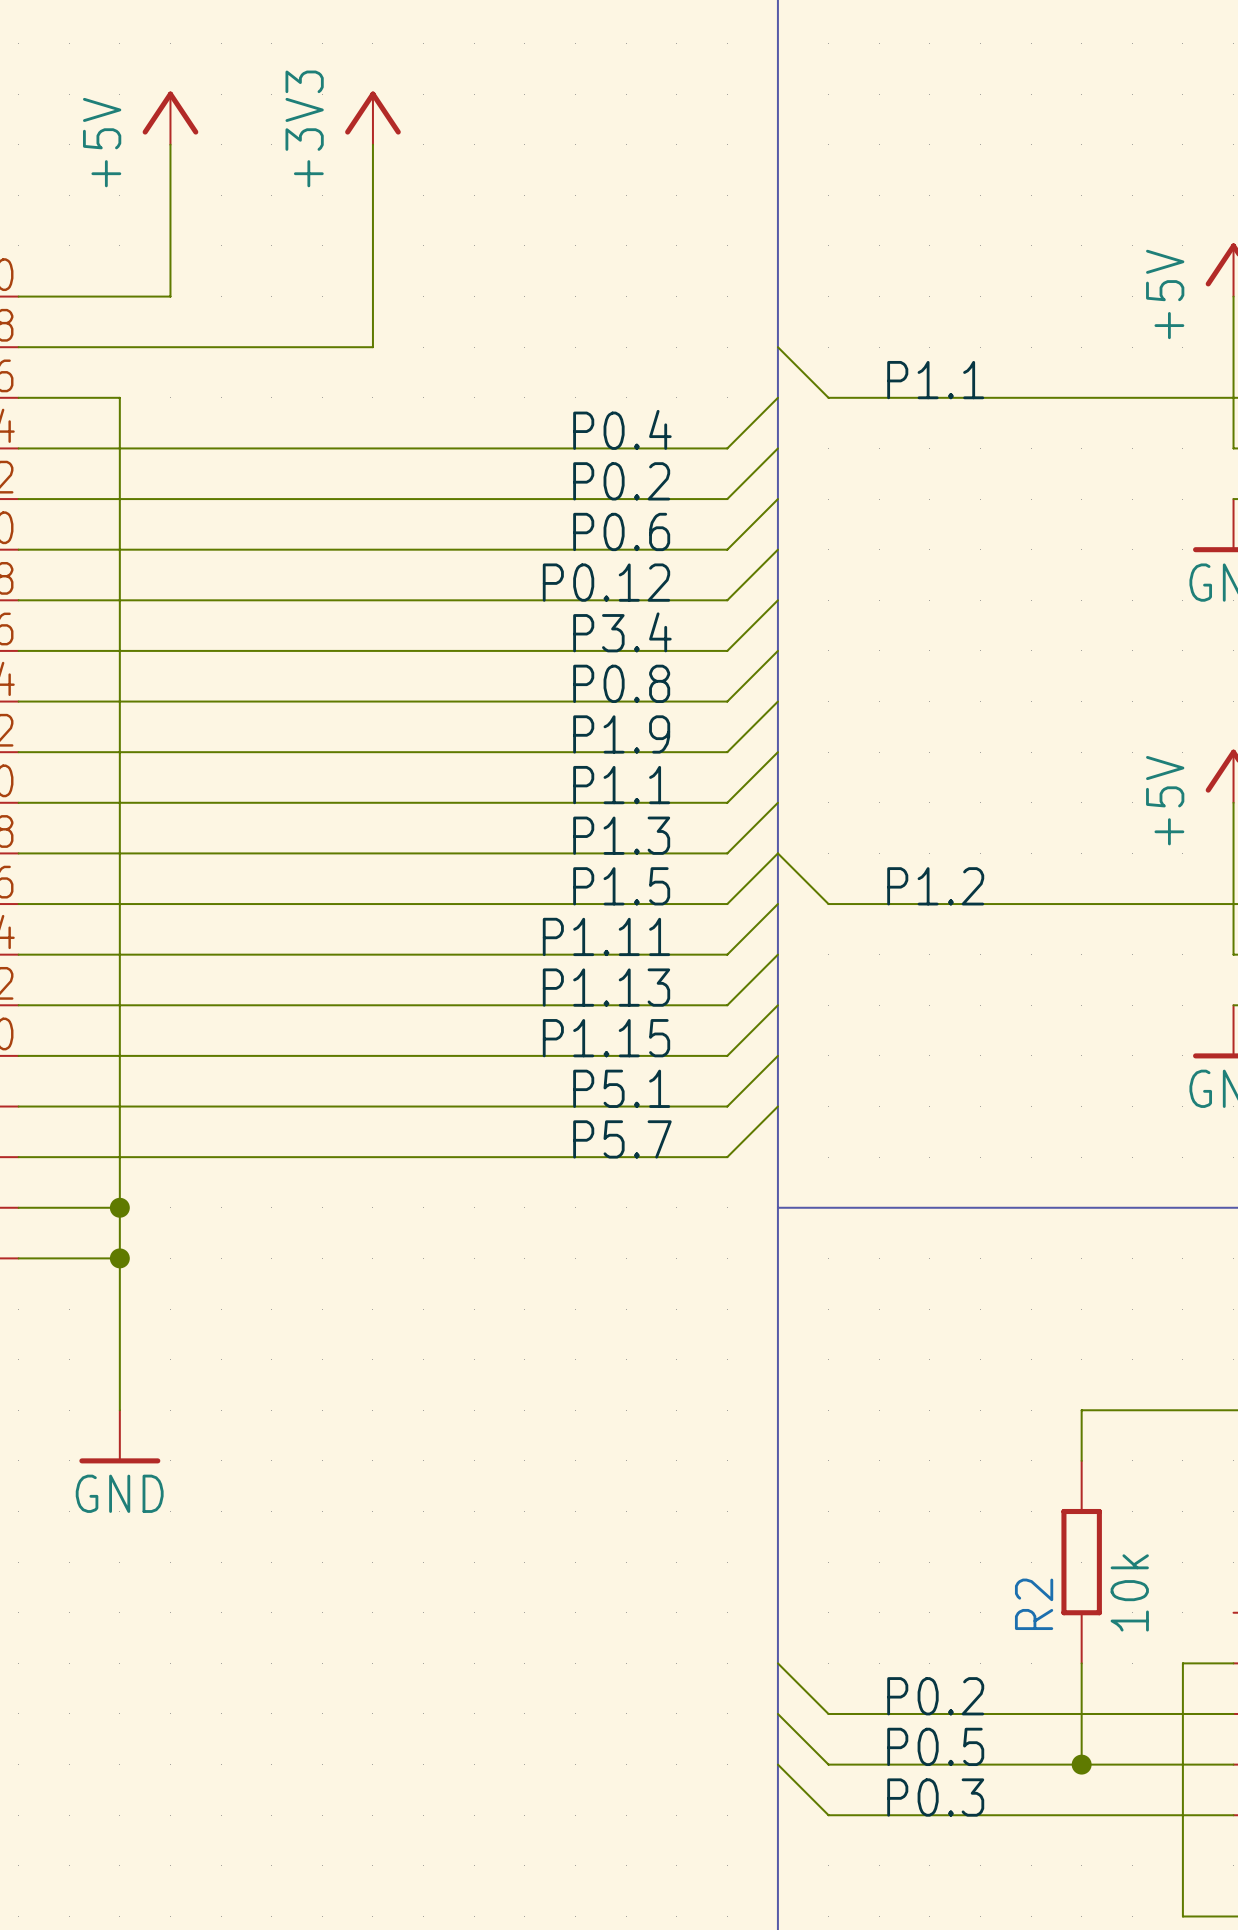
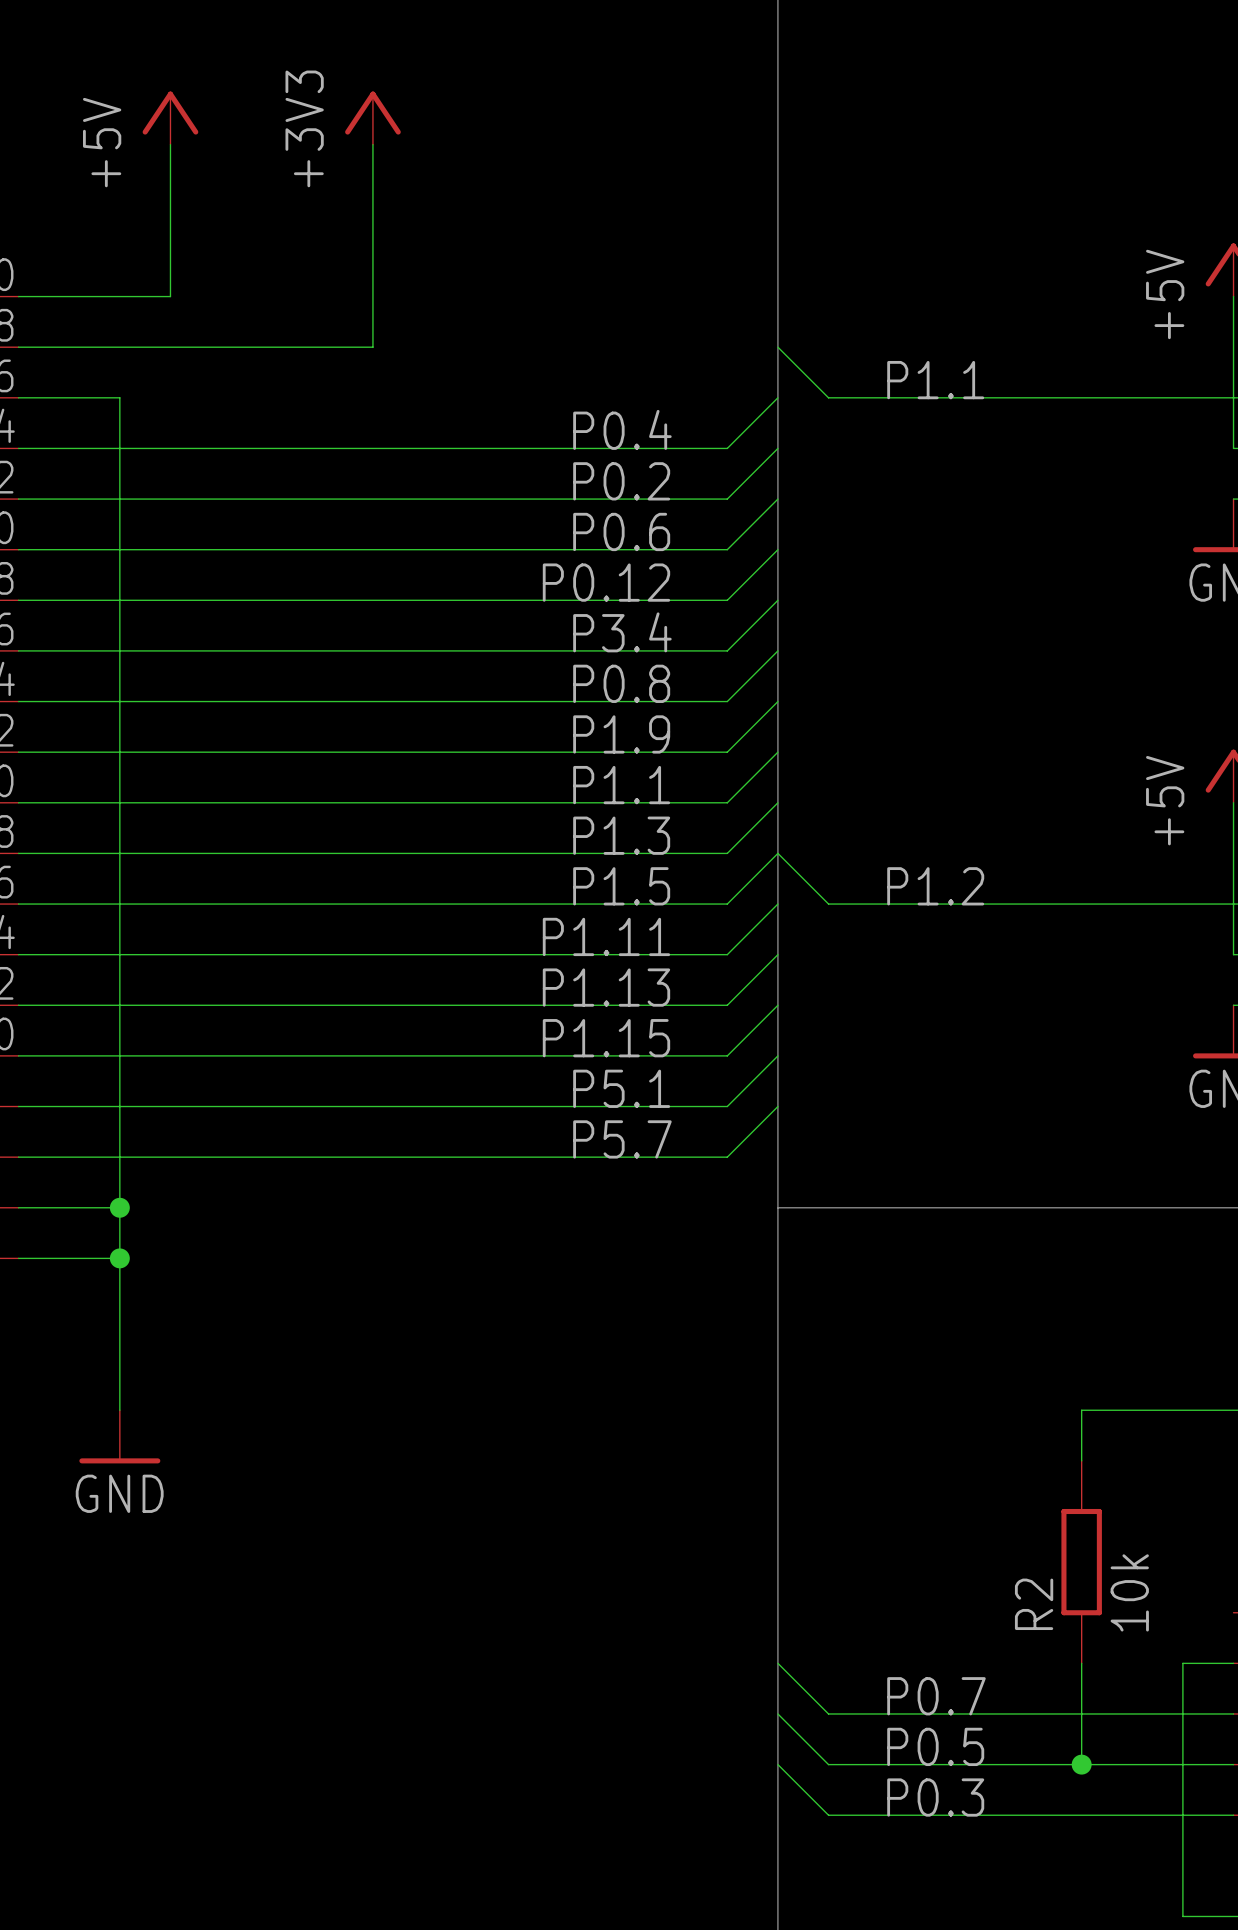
label: P0.2 (935, 1696) -> P0.7 (936, 1696)

